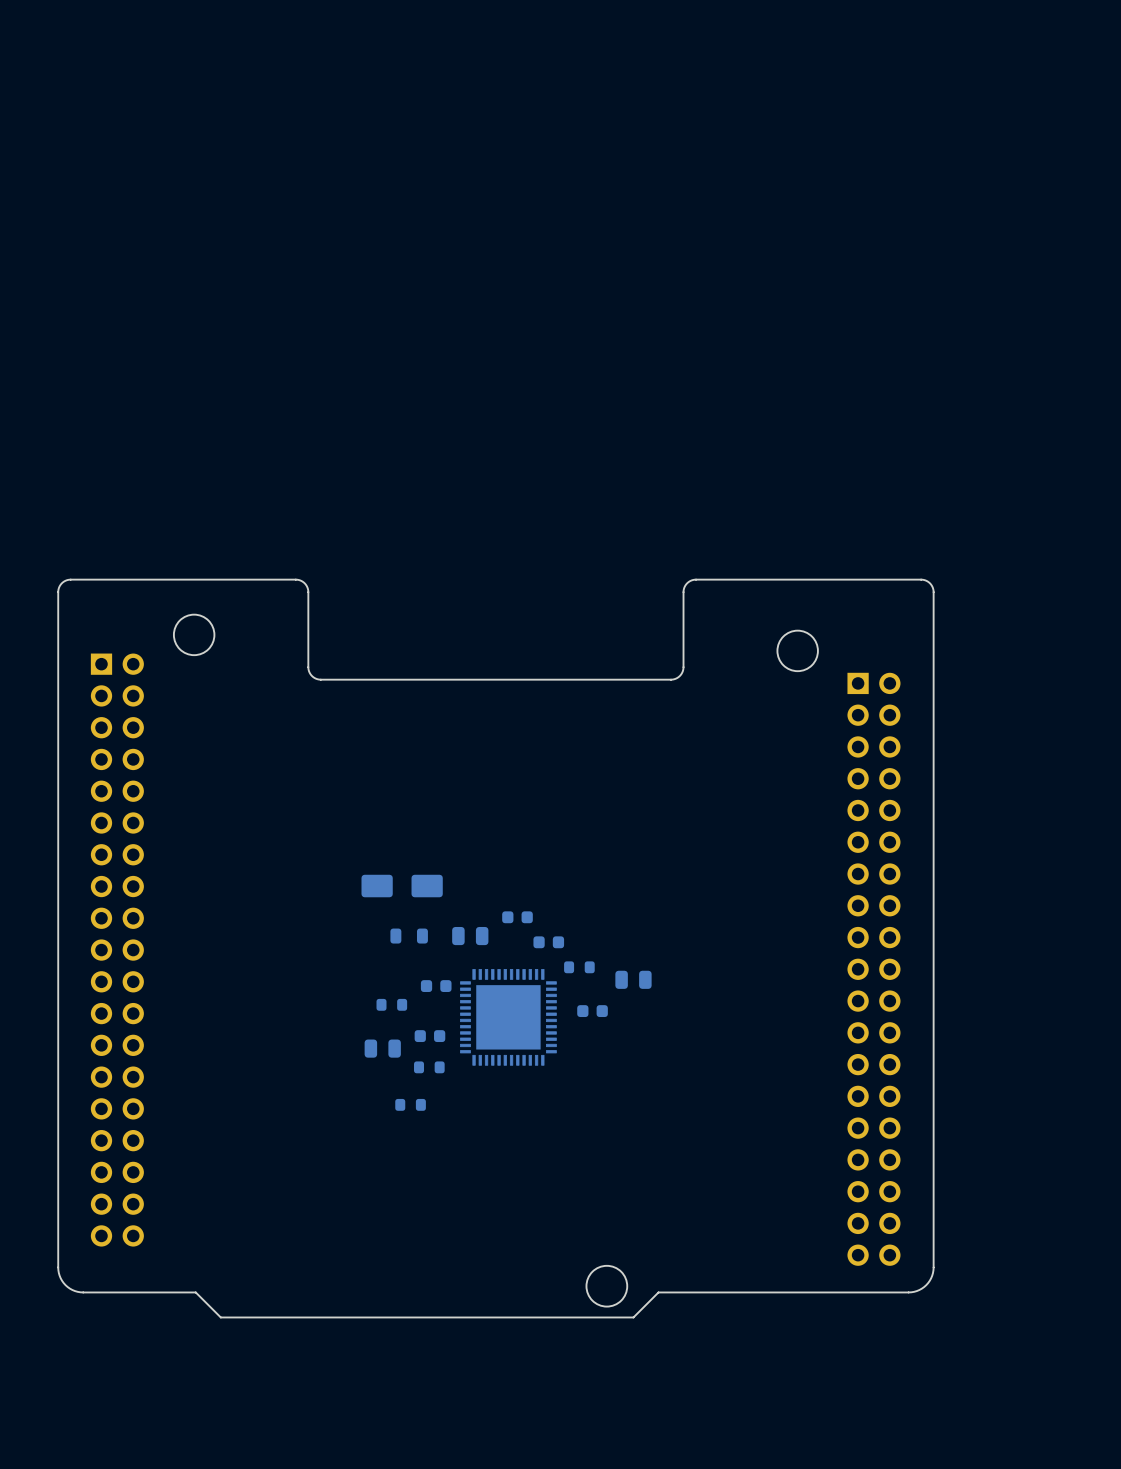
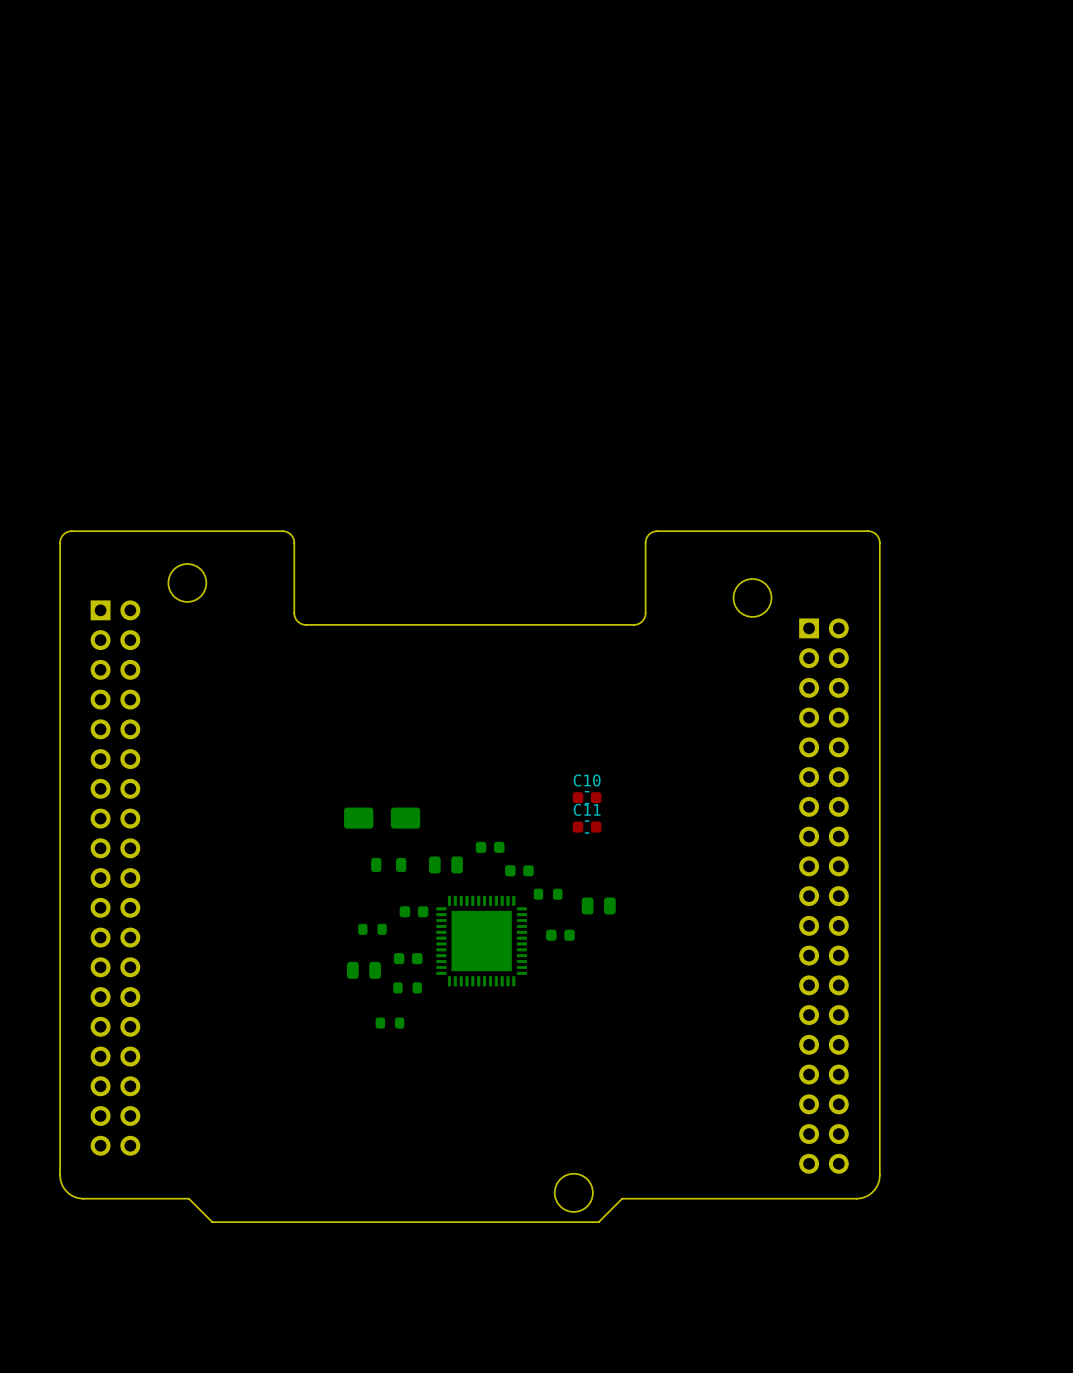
C10: none -> (587, 797)
C11: none -> (587, 827)

